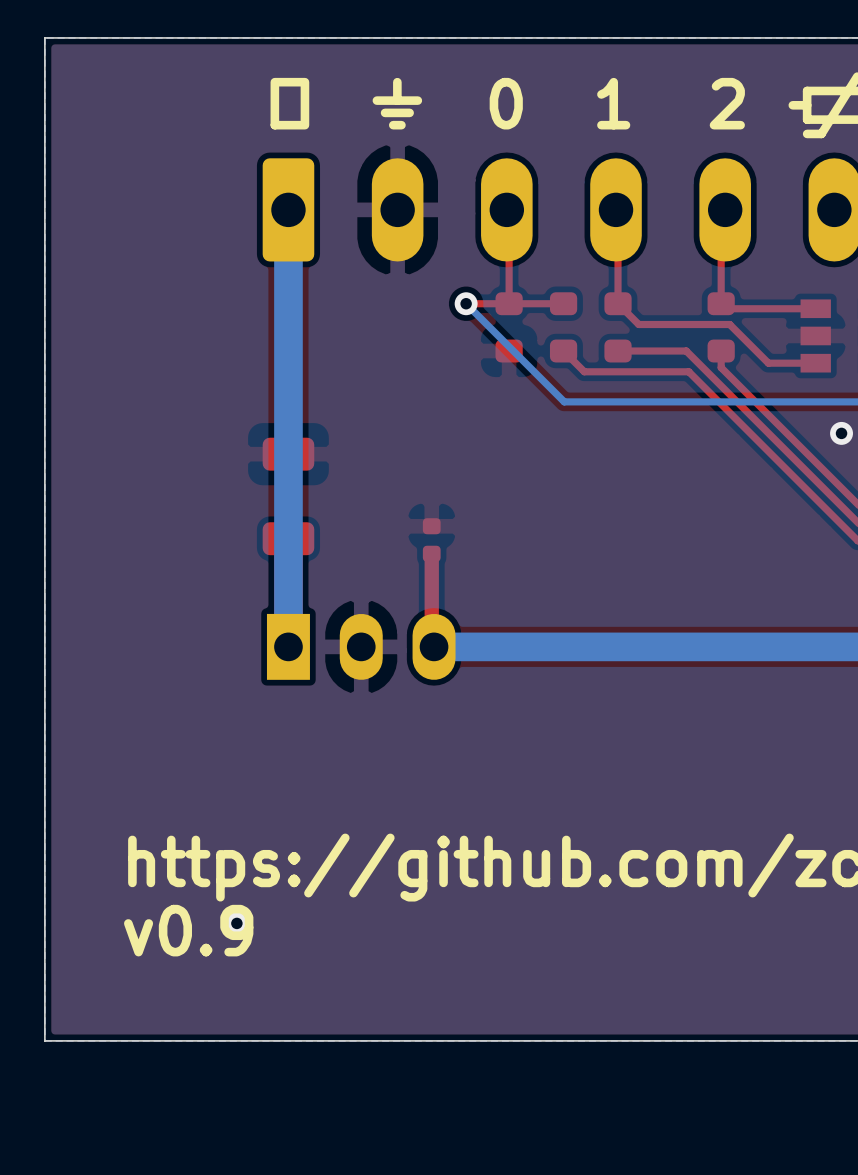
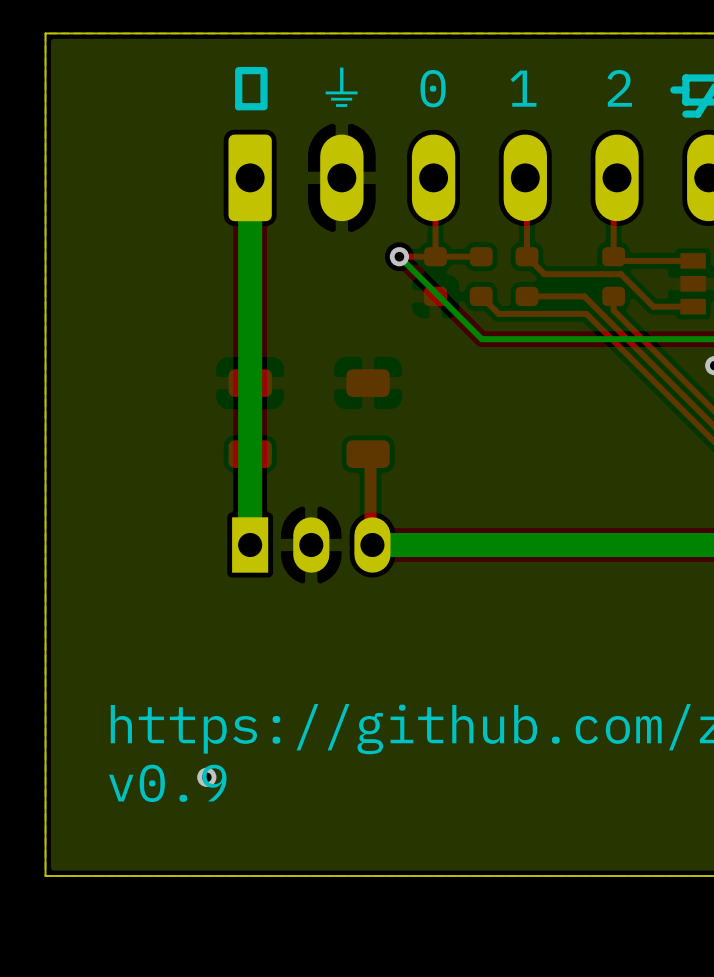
part: none -> (368, 418)
part: (431, 540) -> none

